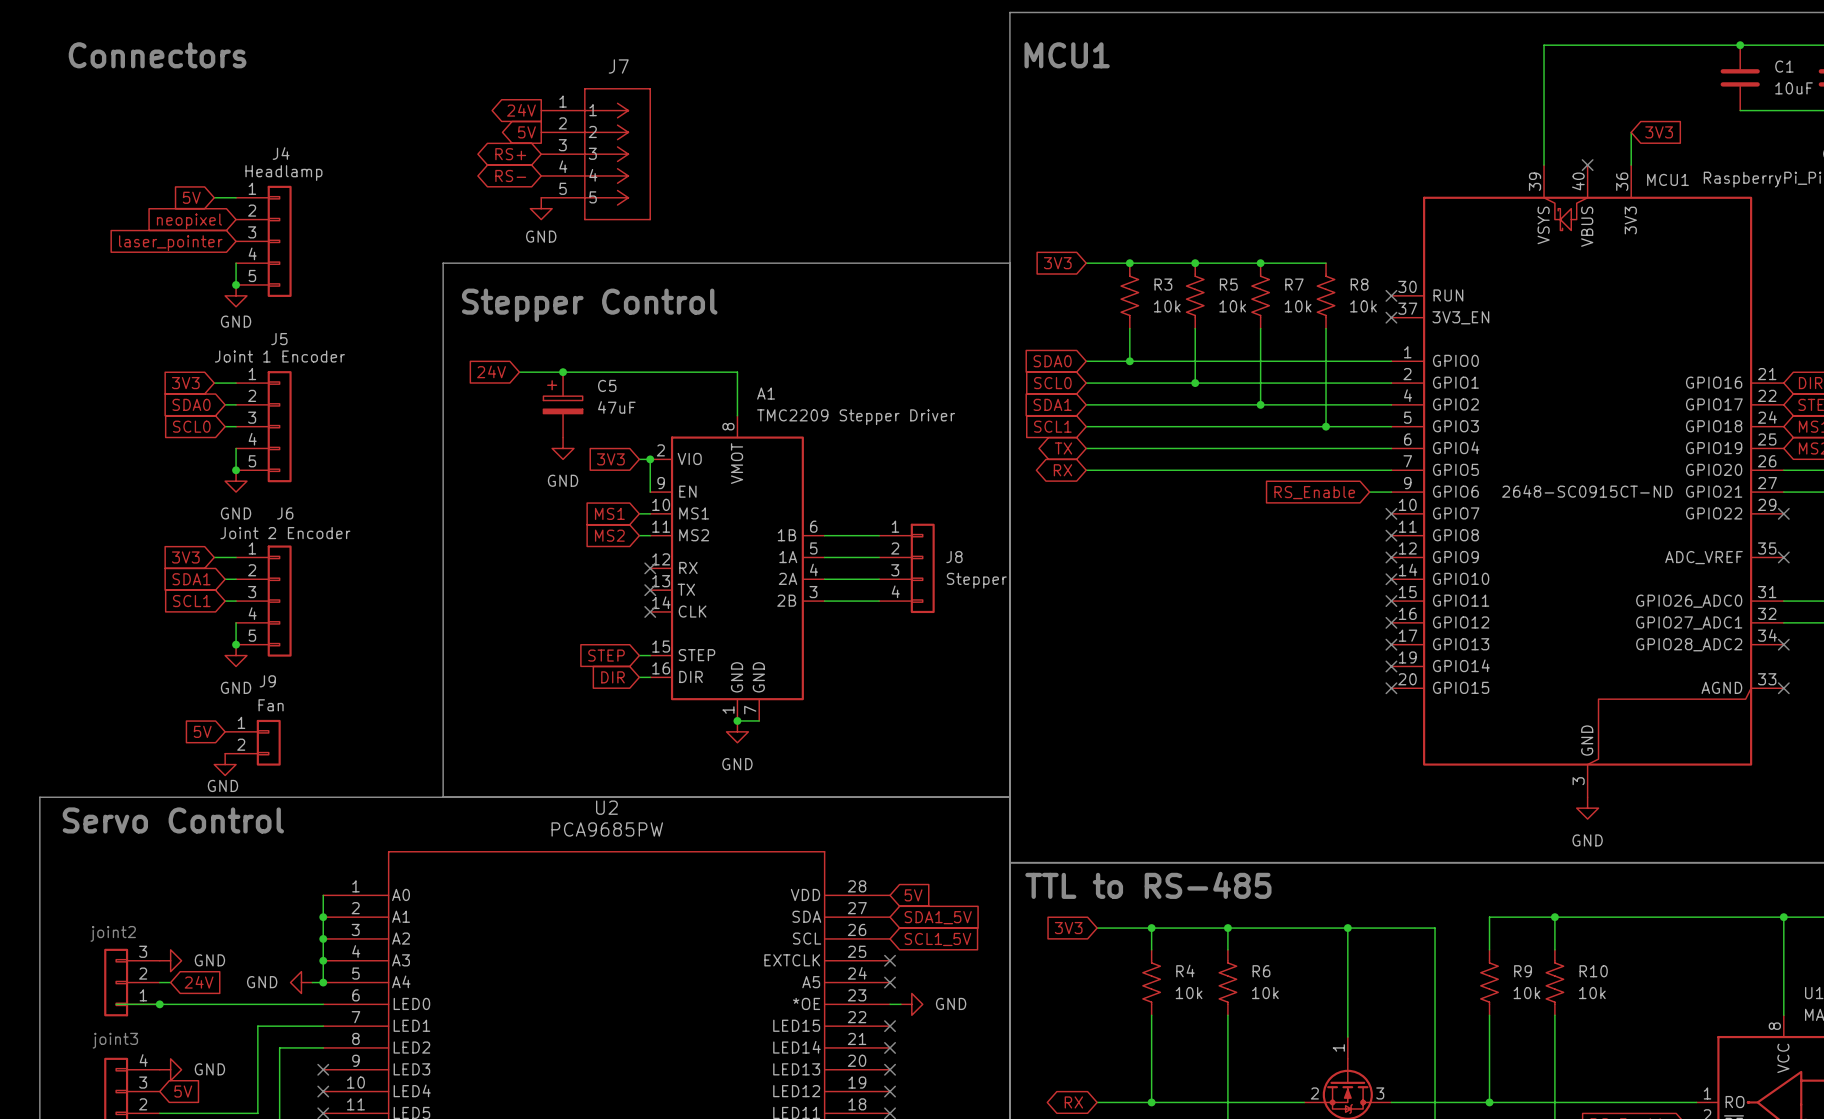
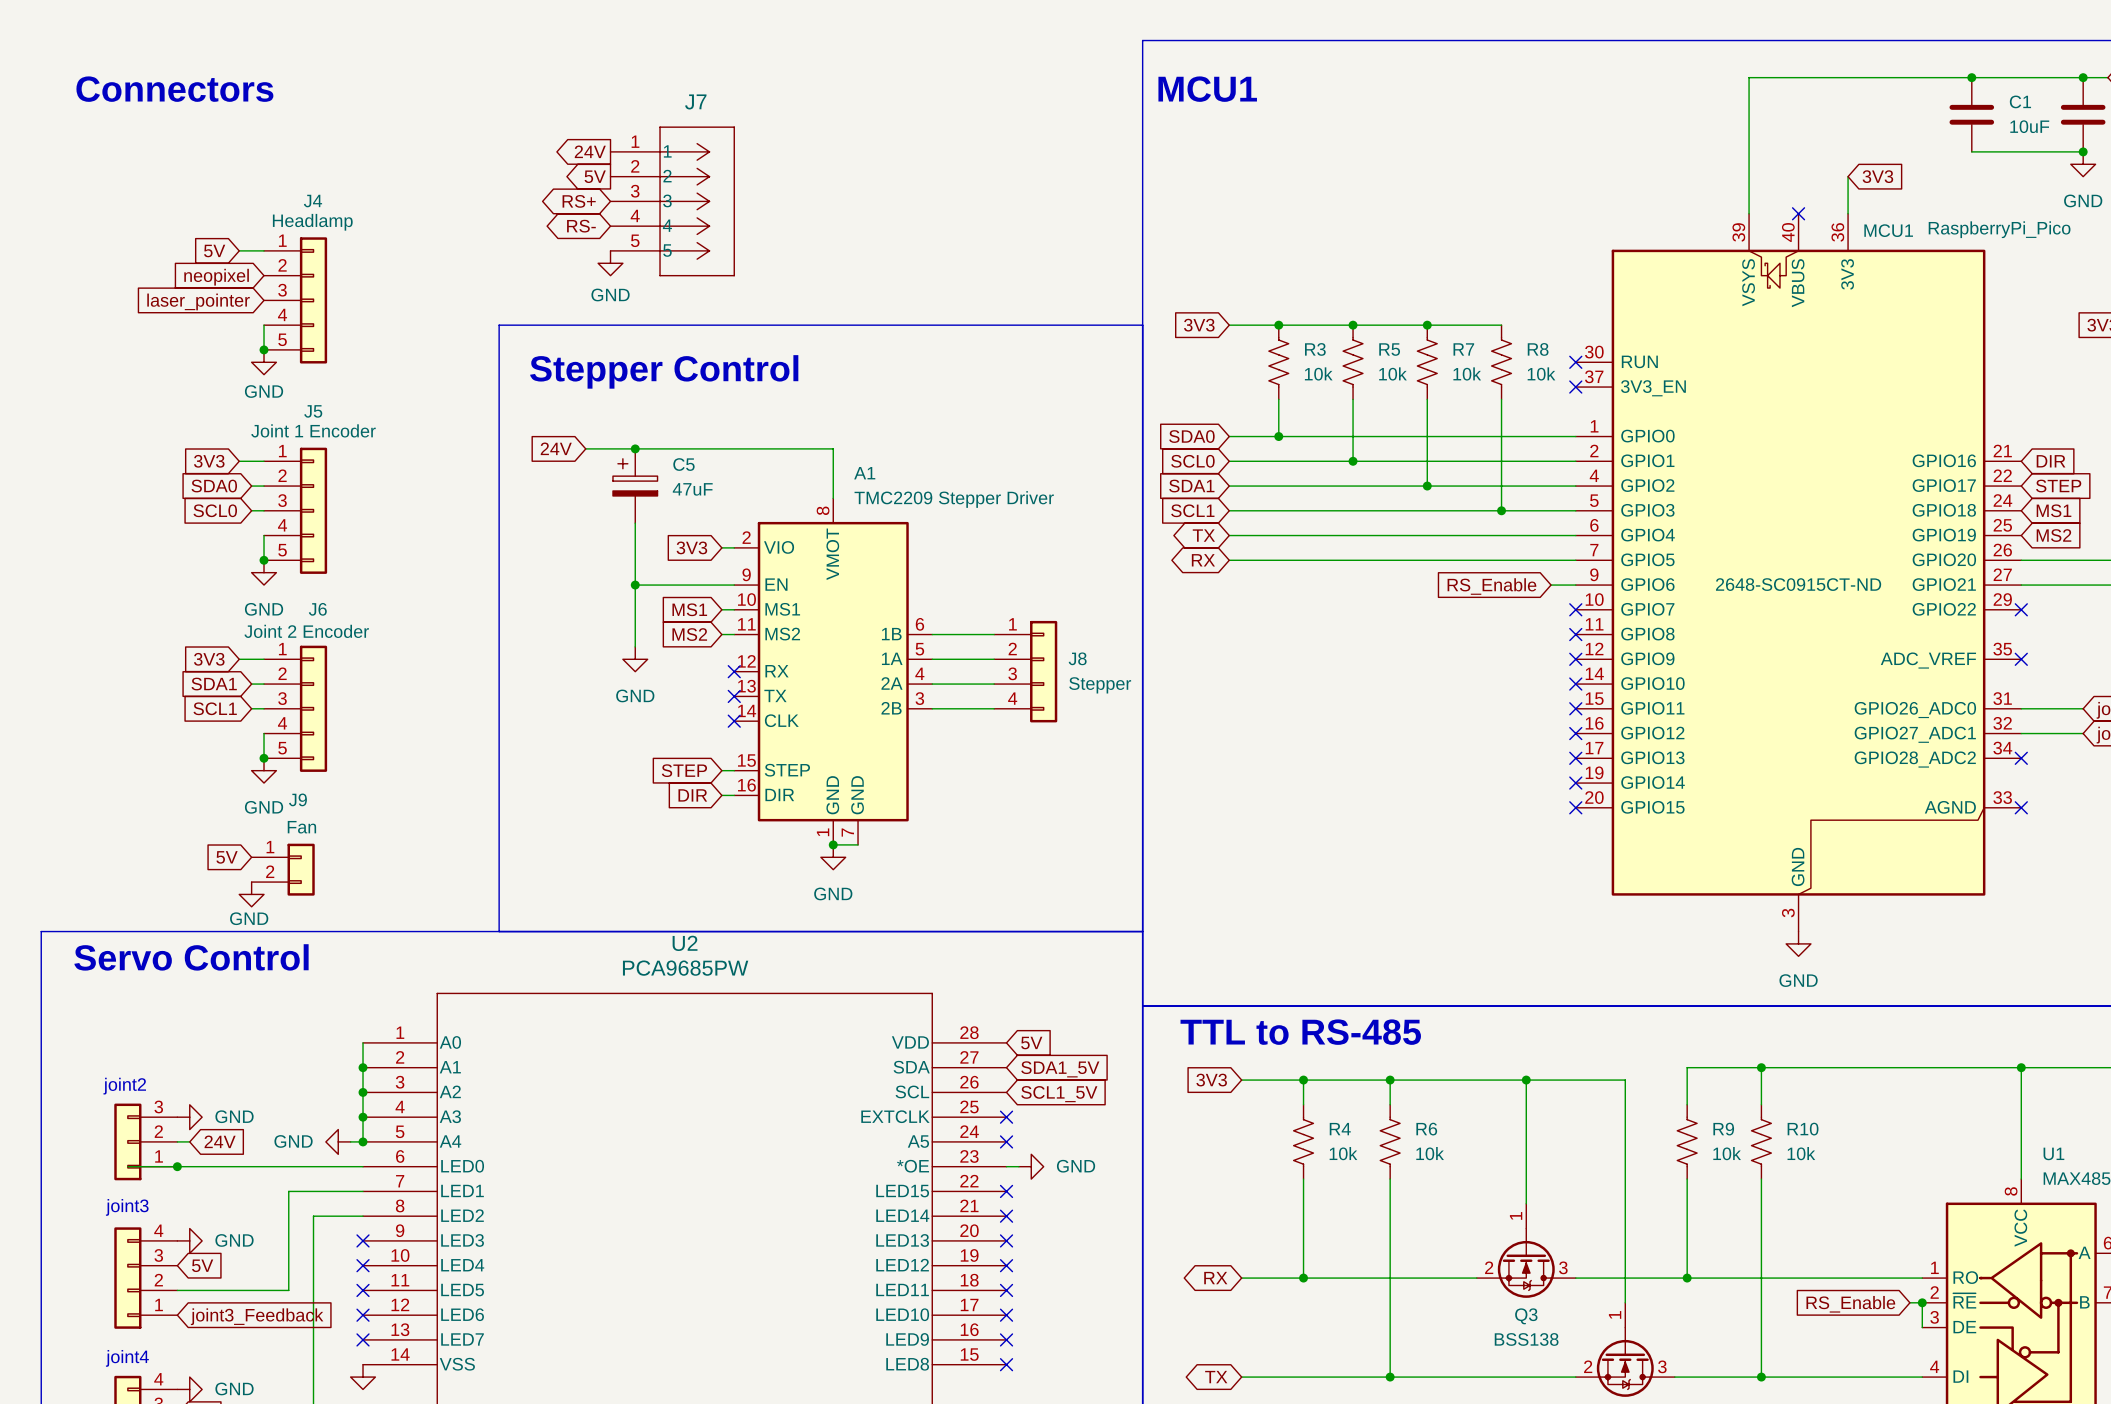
wire: none -> (635, 523) (635, 646)
power symbol position: GND (563, 448) -> GND (635, 659)
wire: (650, 459) (650, 492) -> (635, 585) (734, 585)
junction: (650, 459) -> none
junction: none -> (635, 585)

